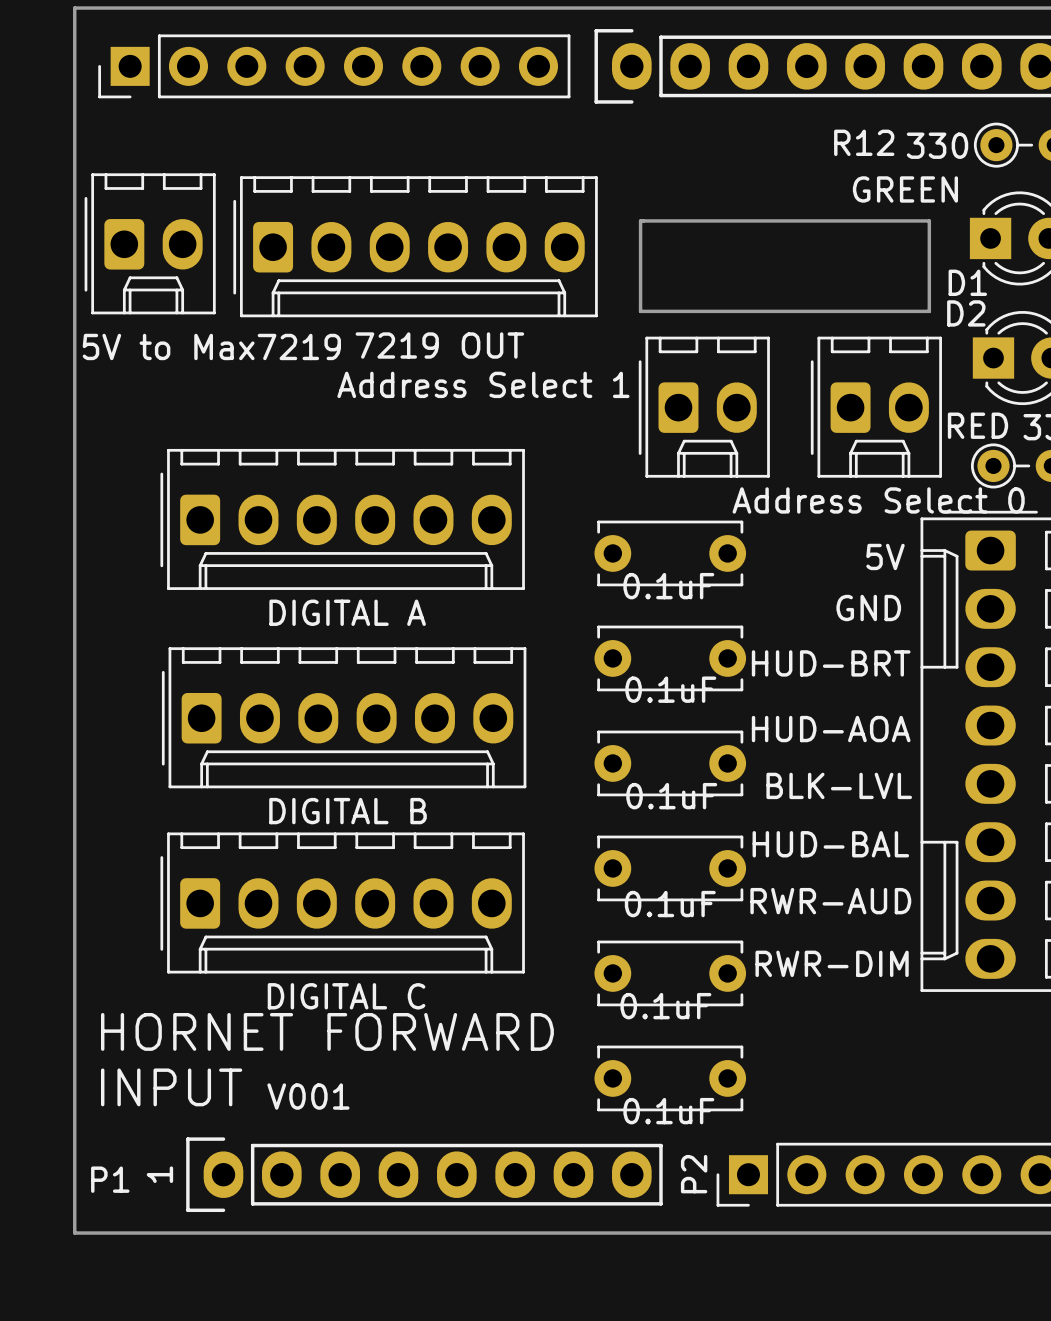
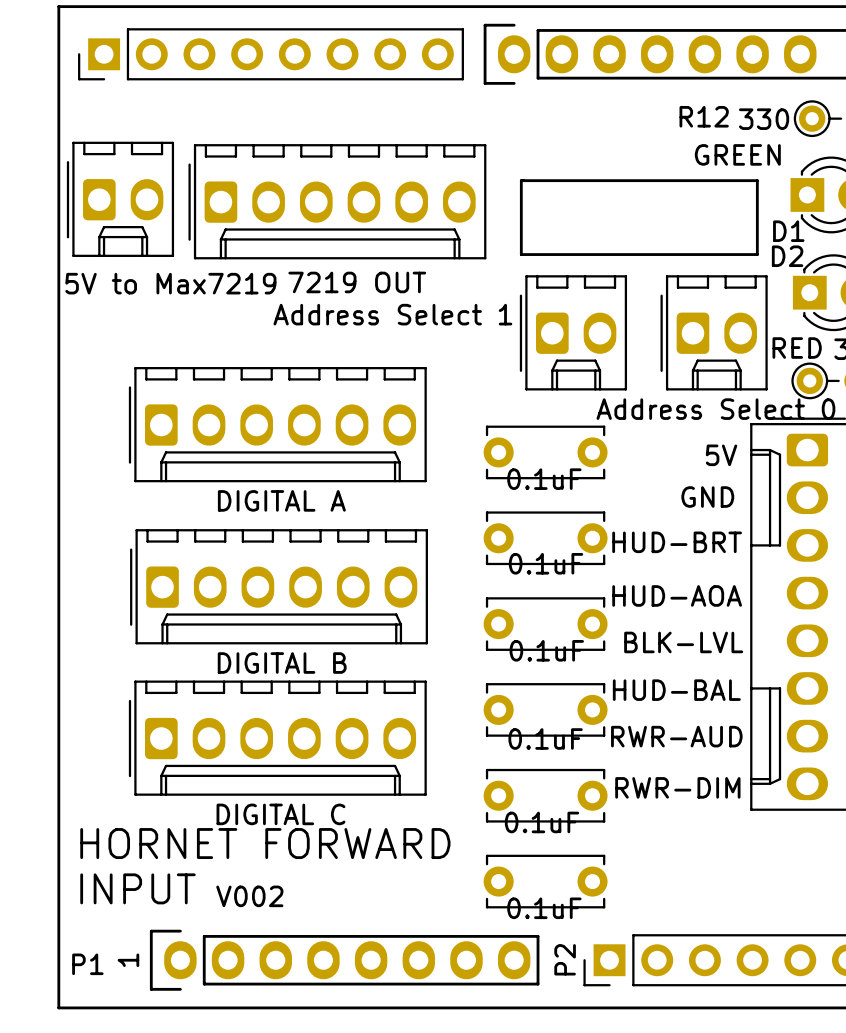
text: V001 (308, 1096) -> V002 (249, 896)

